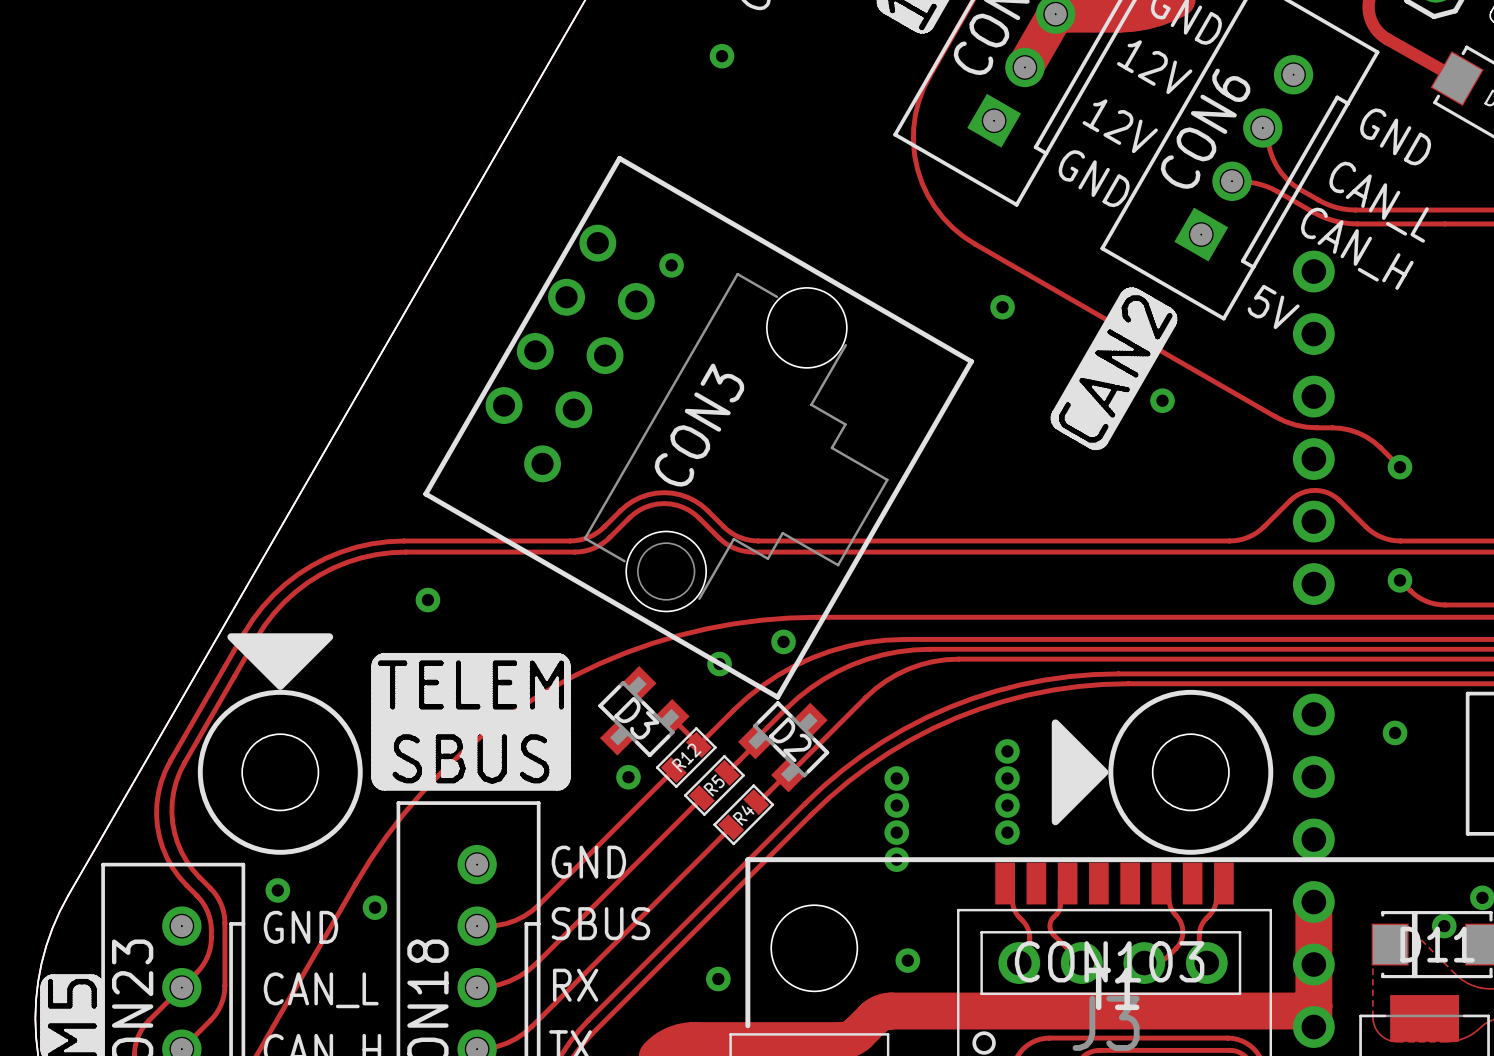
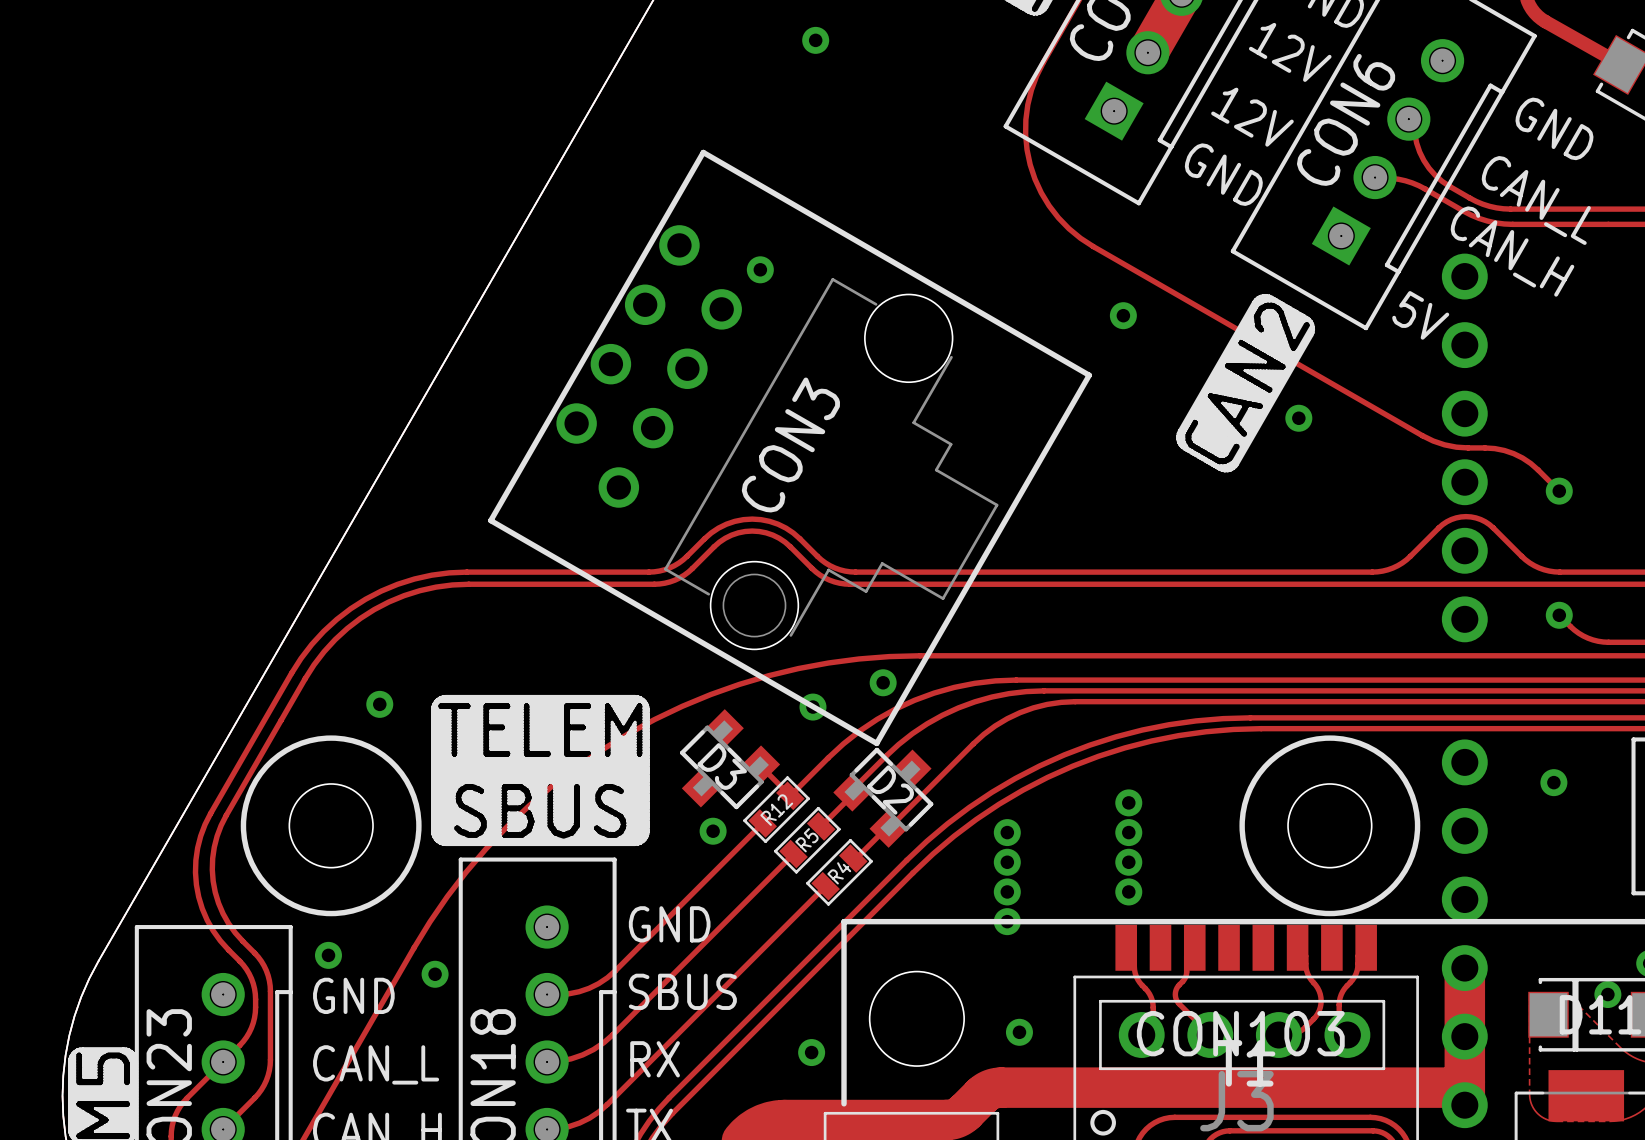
via position: (427, 600) -> (379, 704)
drawing: [227, 633, 334, 690] -> none
drawing: [1051, 719, 1109, 826] -> none

